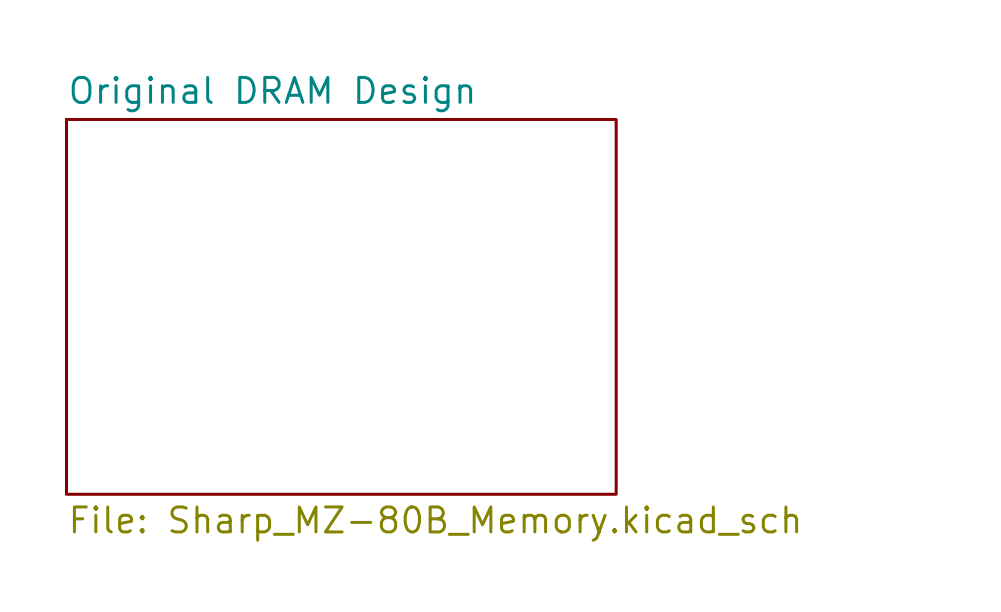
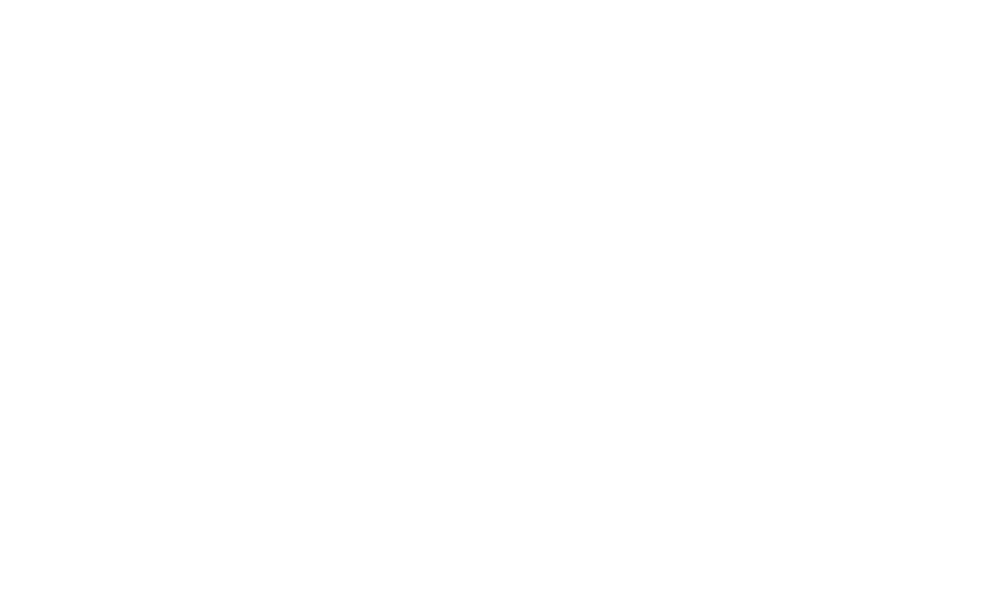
sheet Original DRAM Design: File: Sharp_MZ-80B_Memory.kicad_sch (341, 306) -> none

